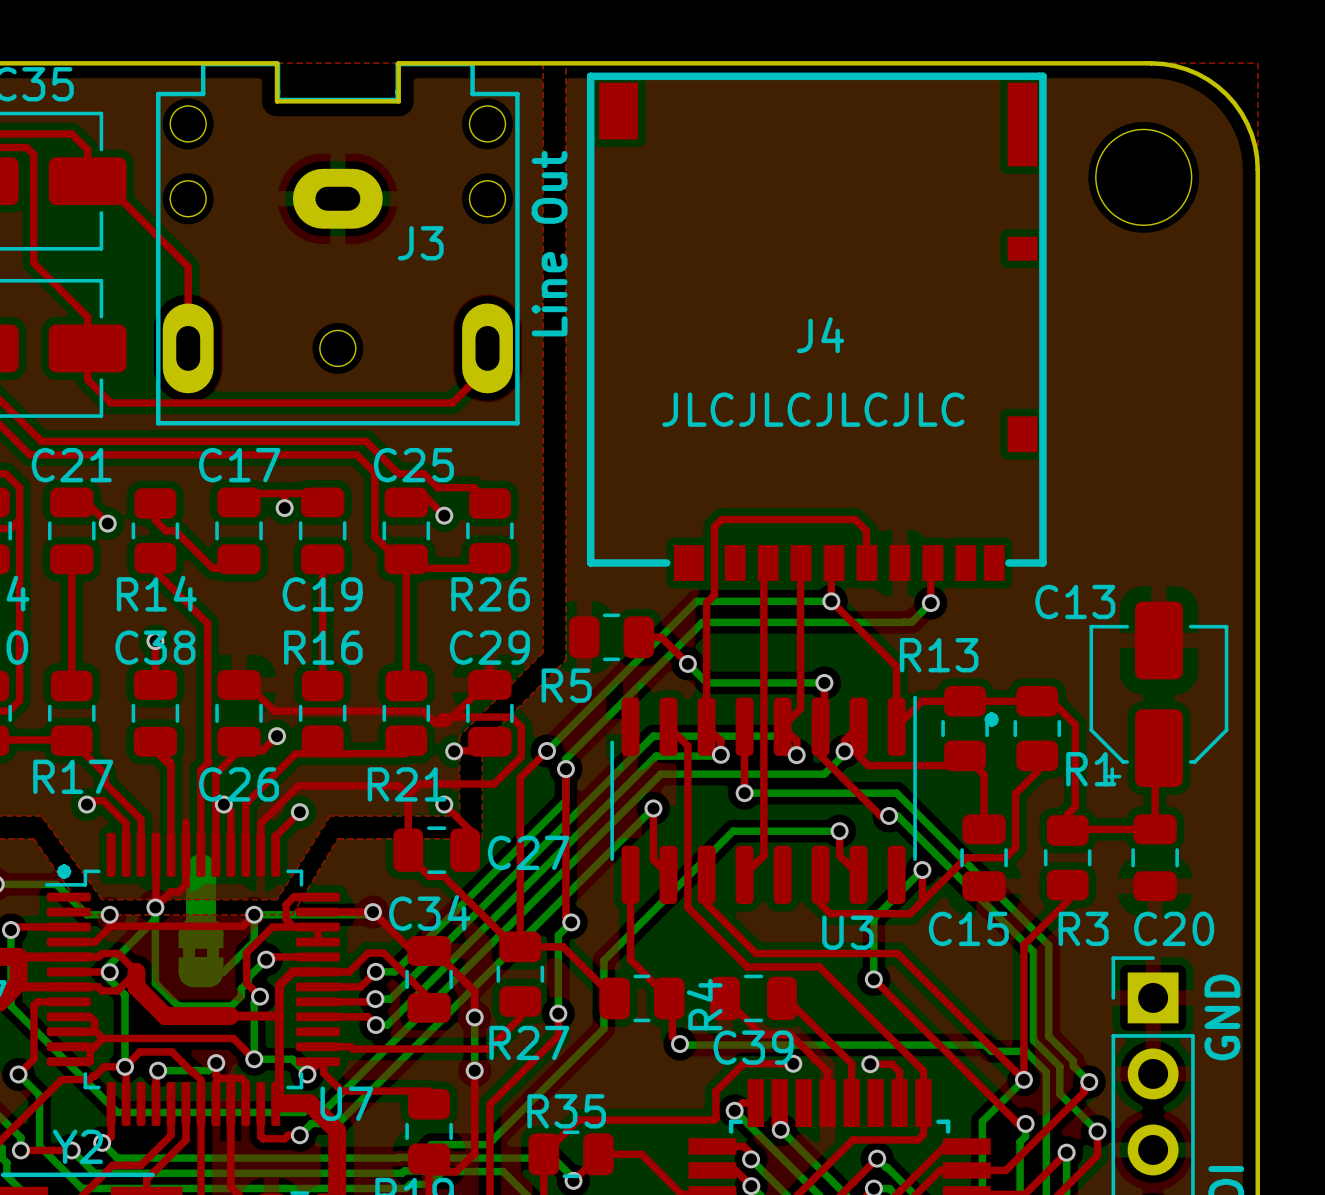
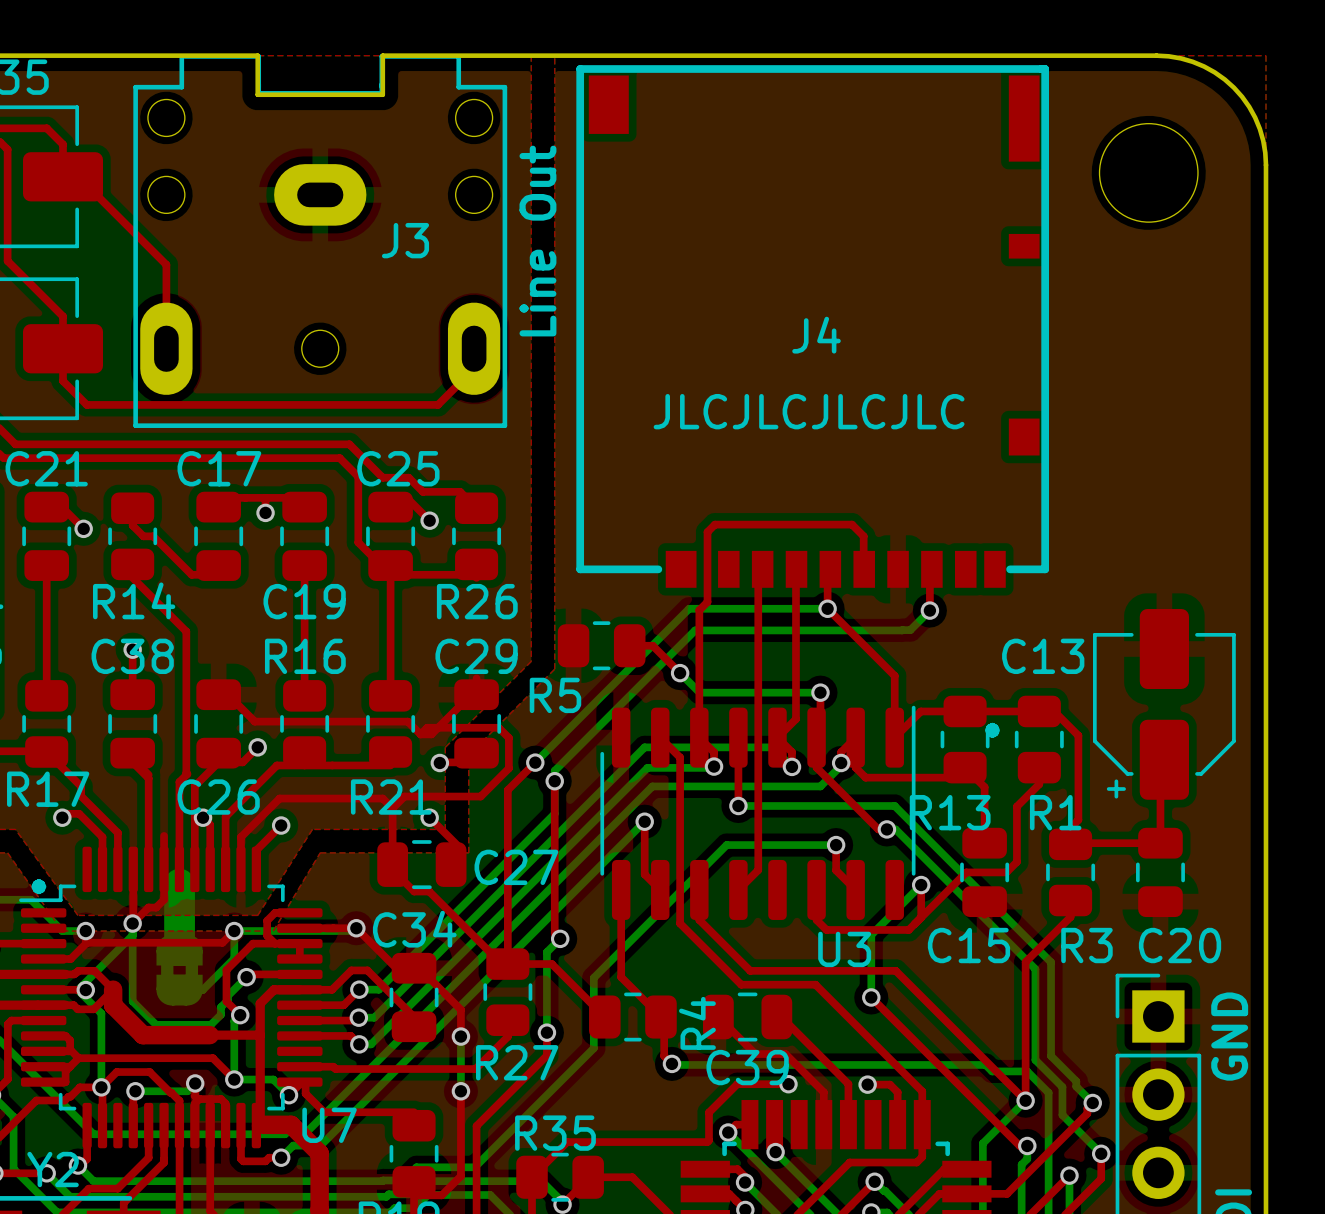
C13 name position: C13 (1075, 601) -> C13 (1043, 656)
R13 name position: R13 (939, 655) -> R13 (950, 812)
R1 name position: R1 (1091, 769) -> R1 (1055, 812)

